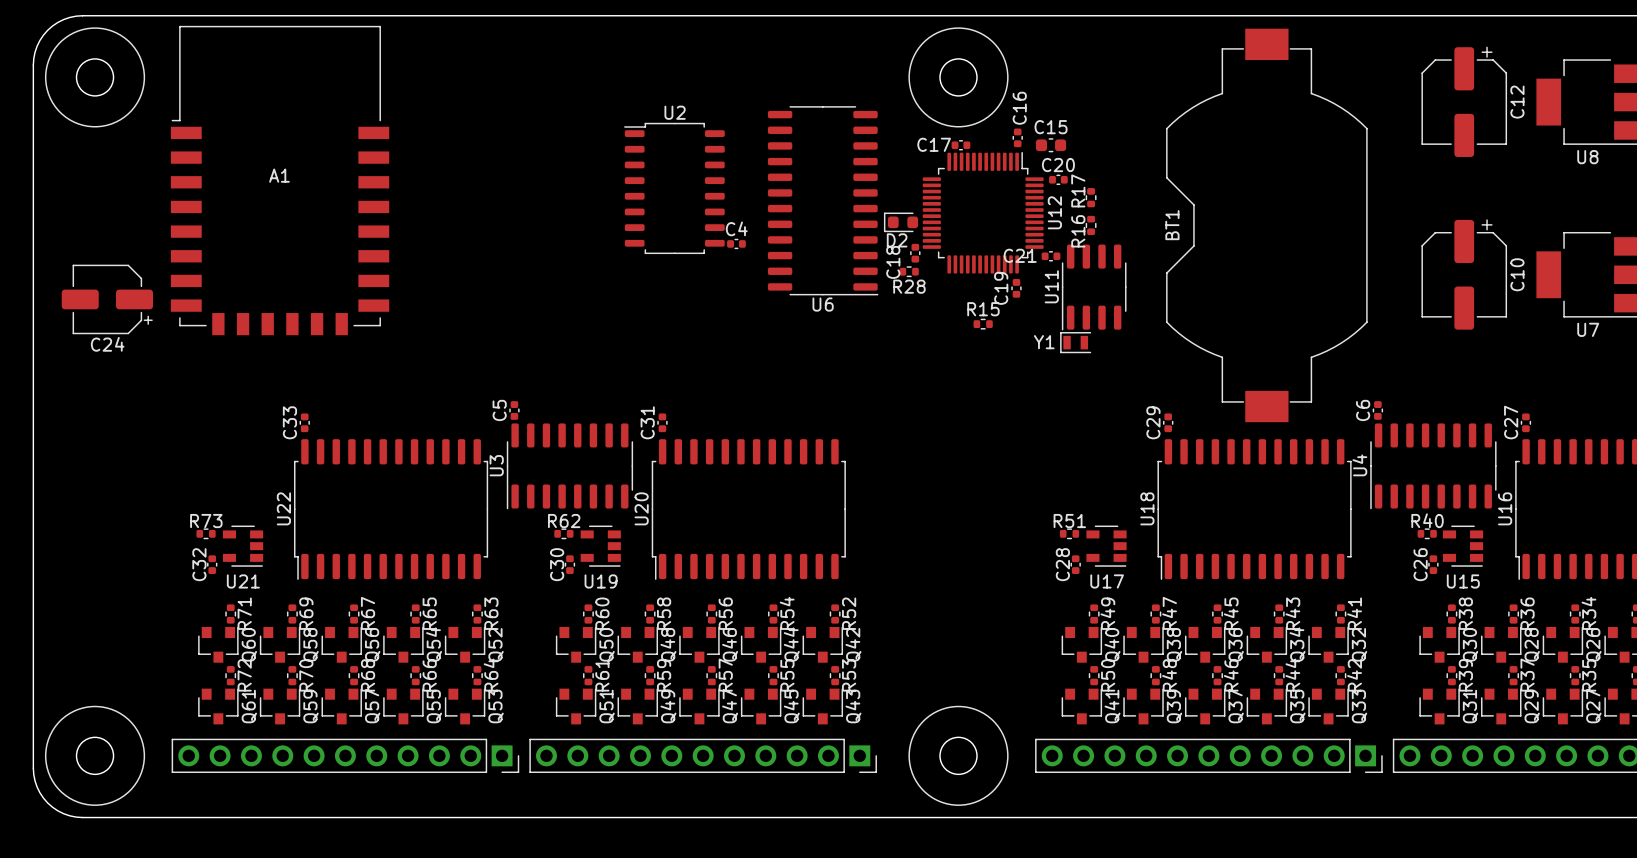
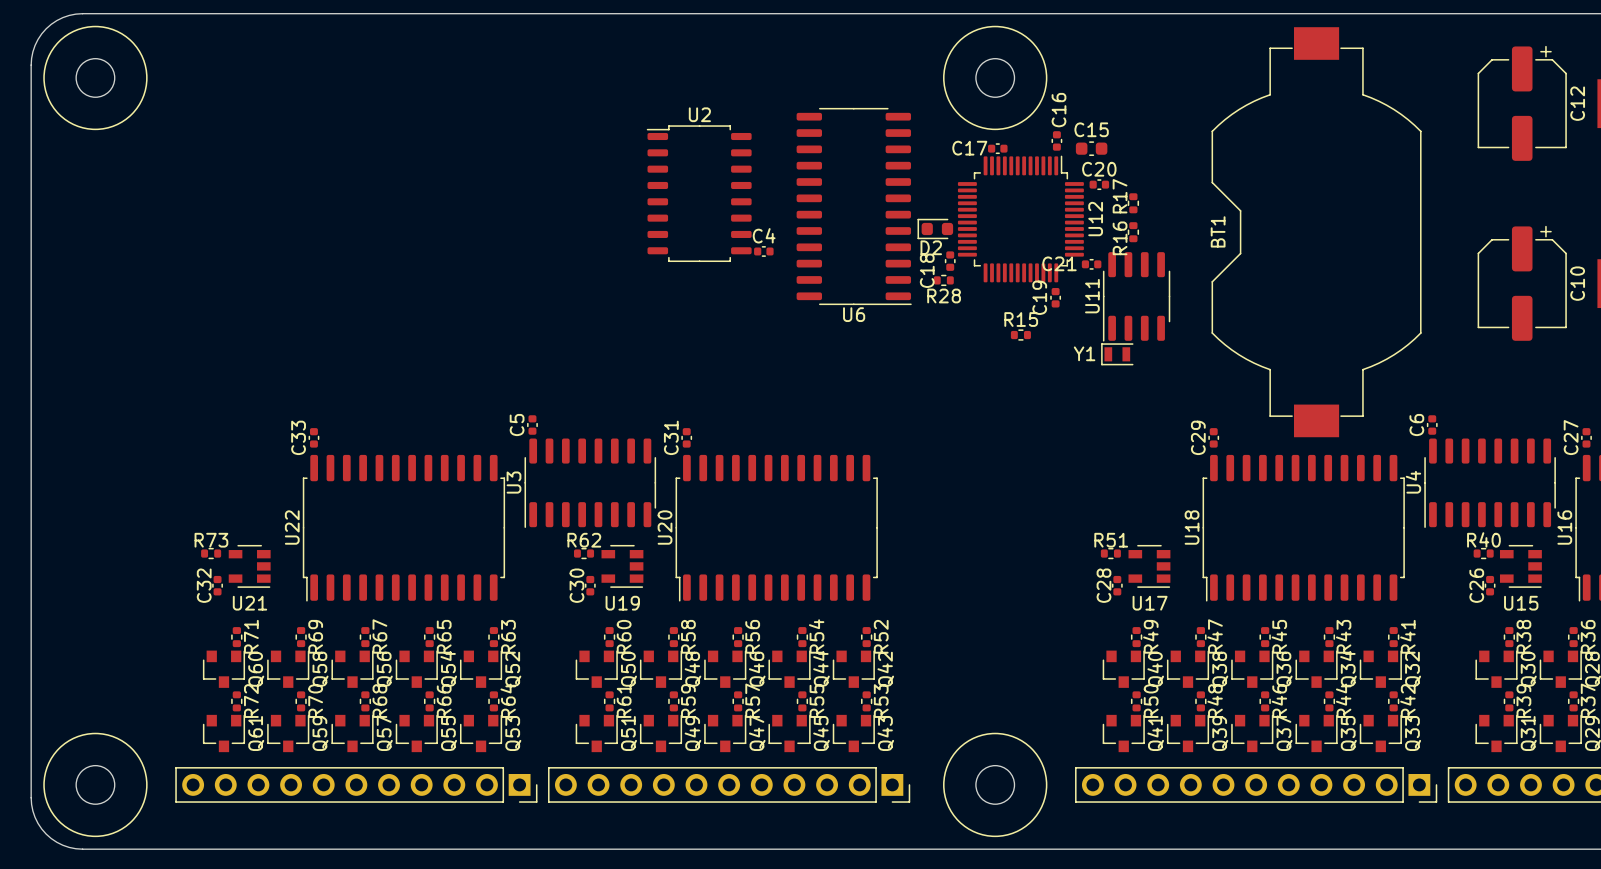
A1: (280, 180) -> none
C24: (107, 299) -> none

